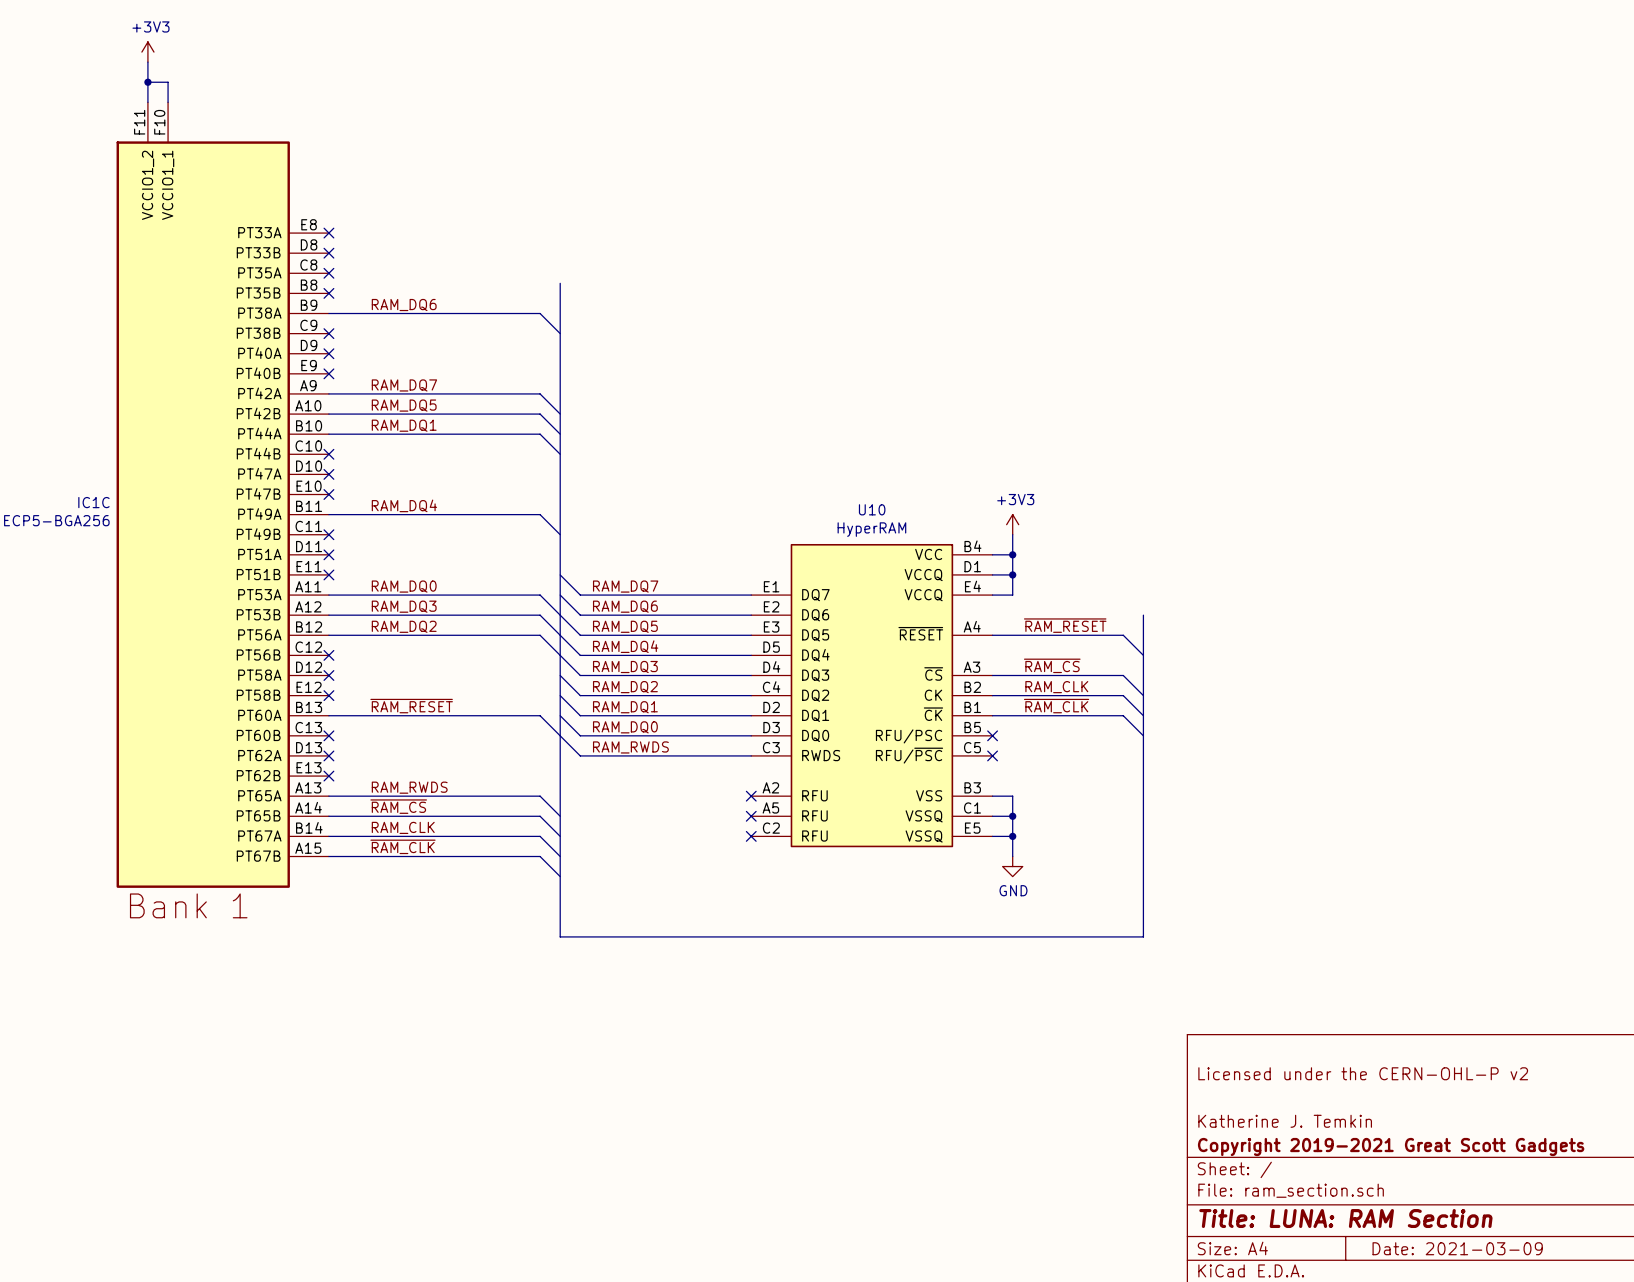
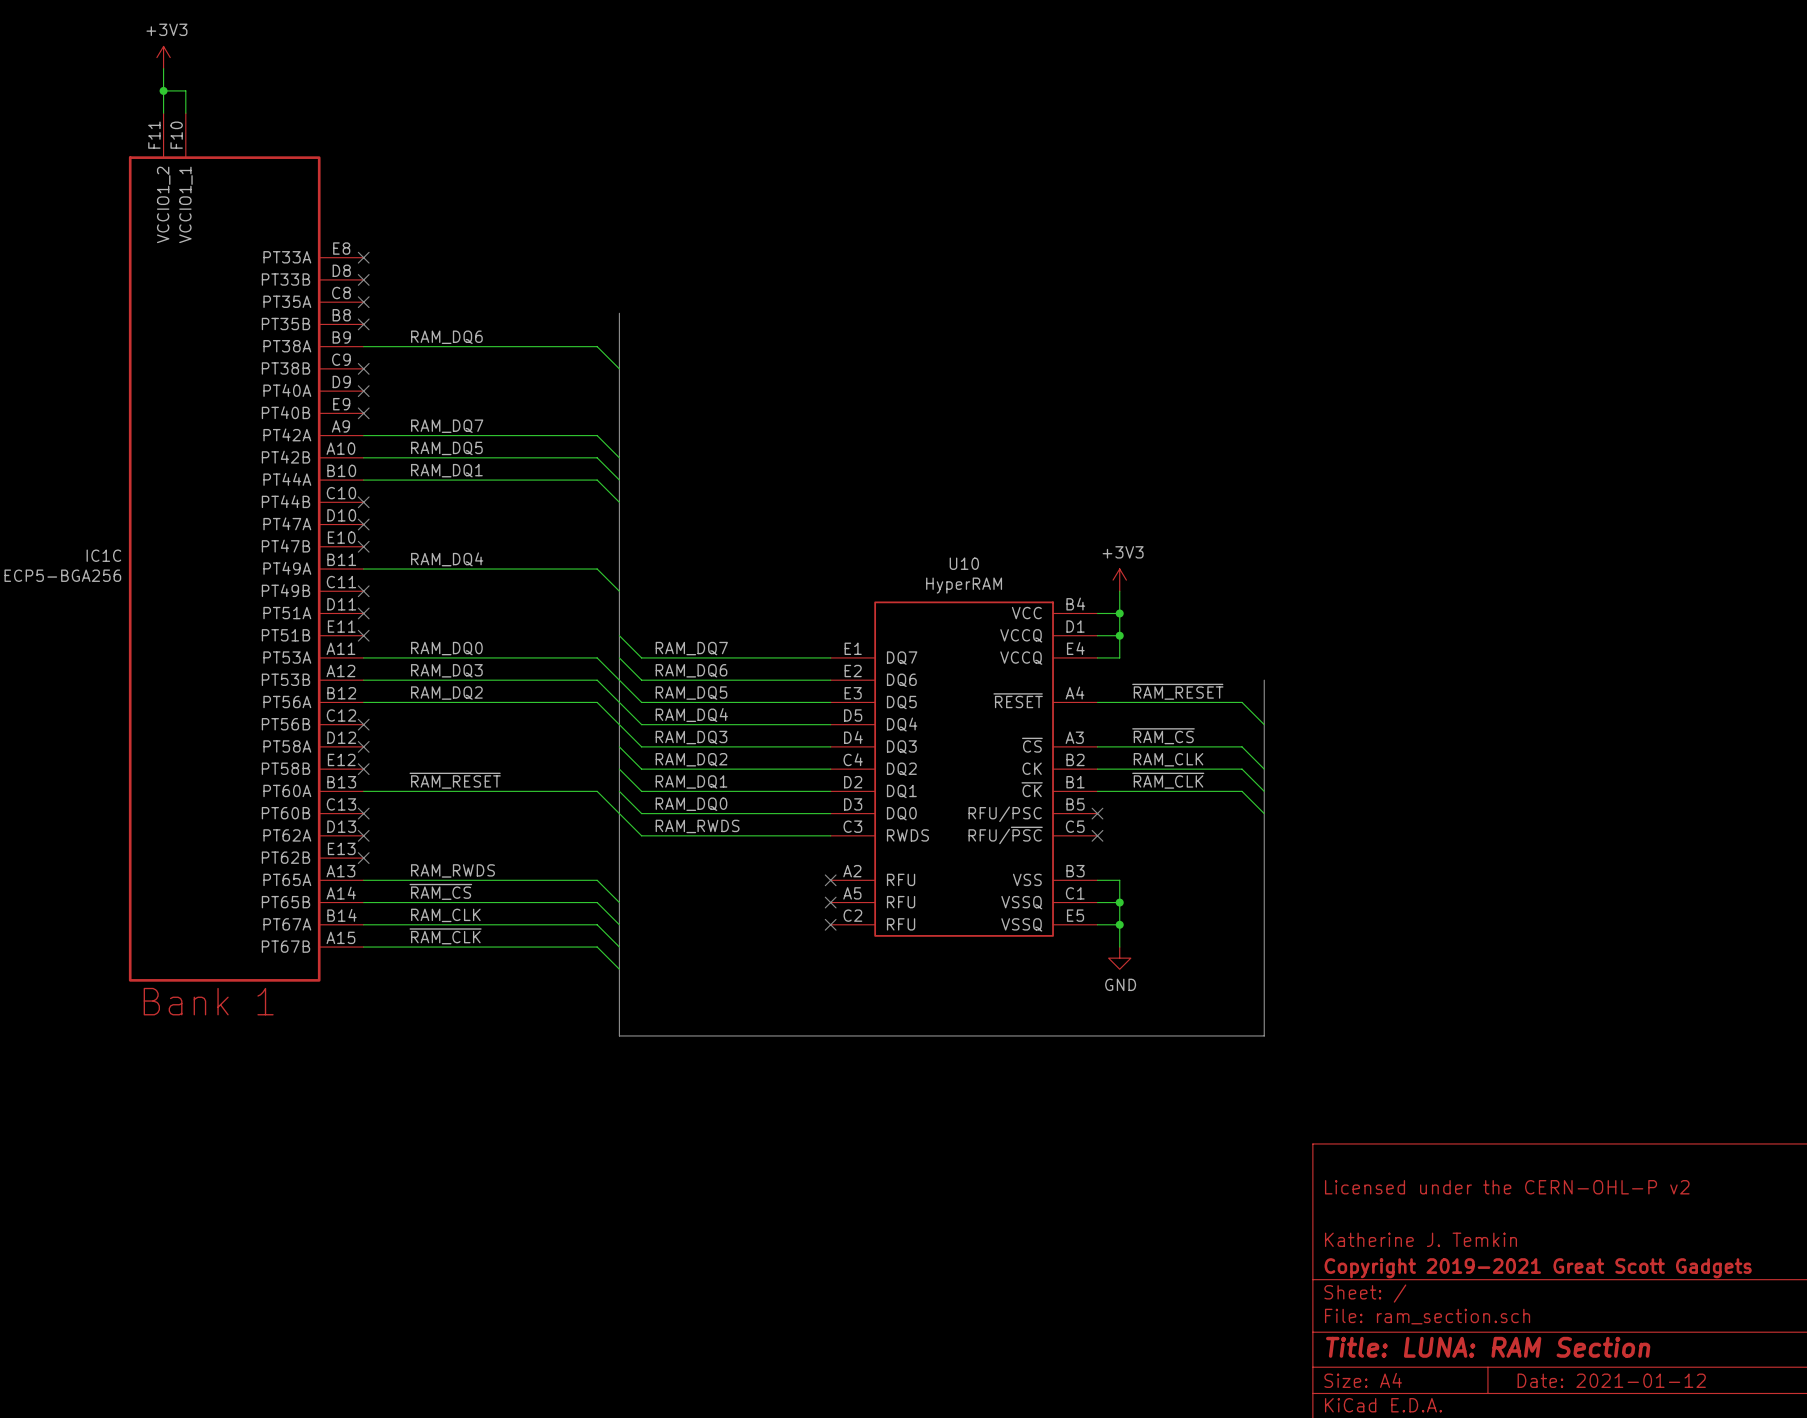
title block: Date: 2021-03-09 (1457, 1248) -> Date: 2021-01-12 (1611, 1380)

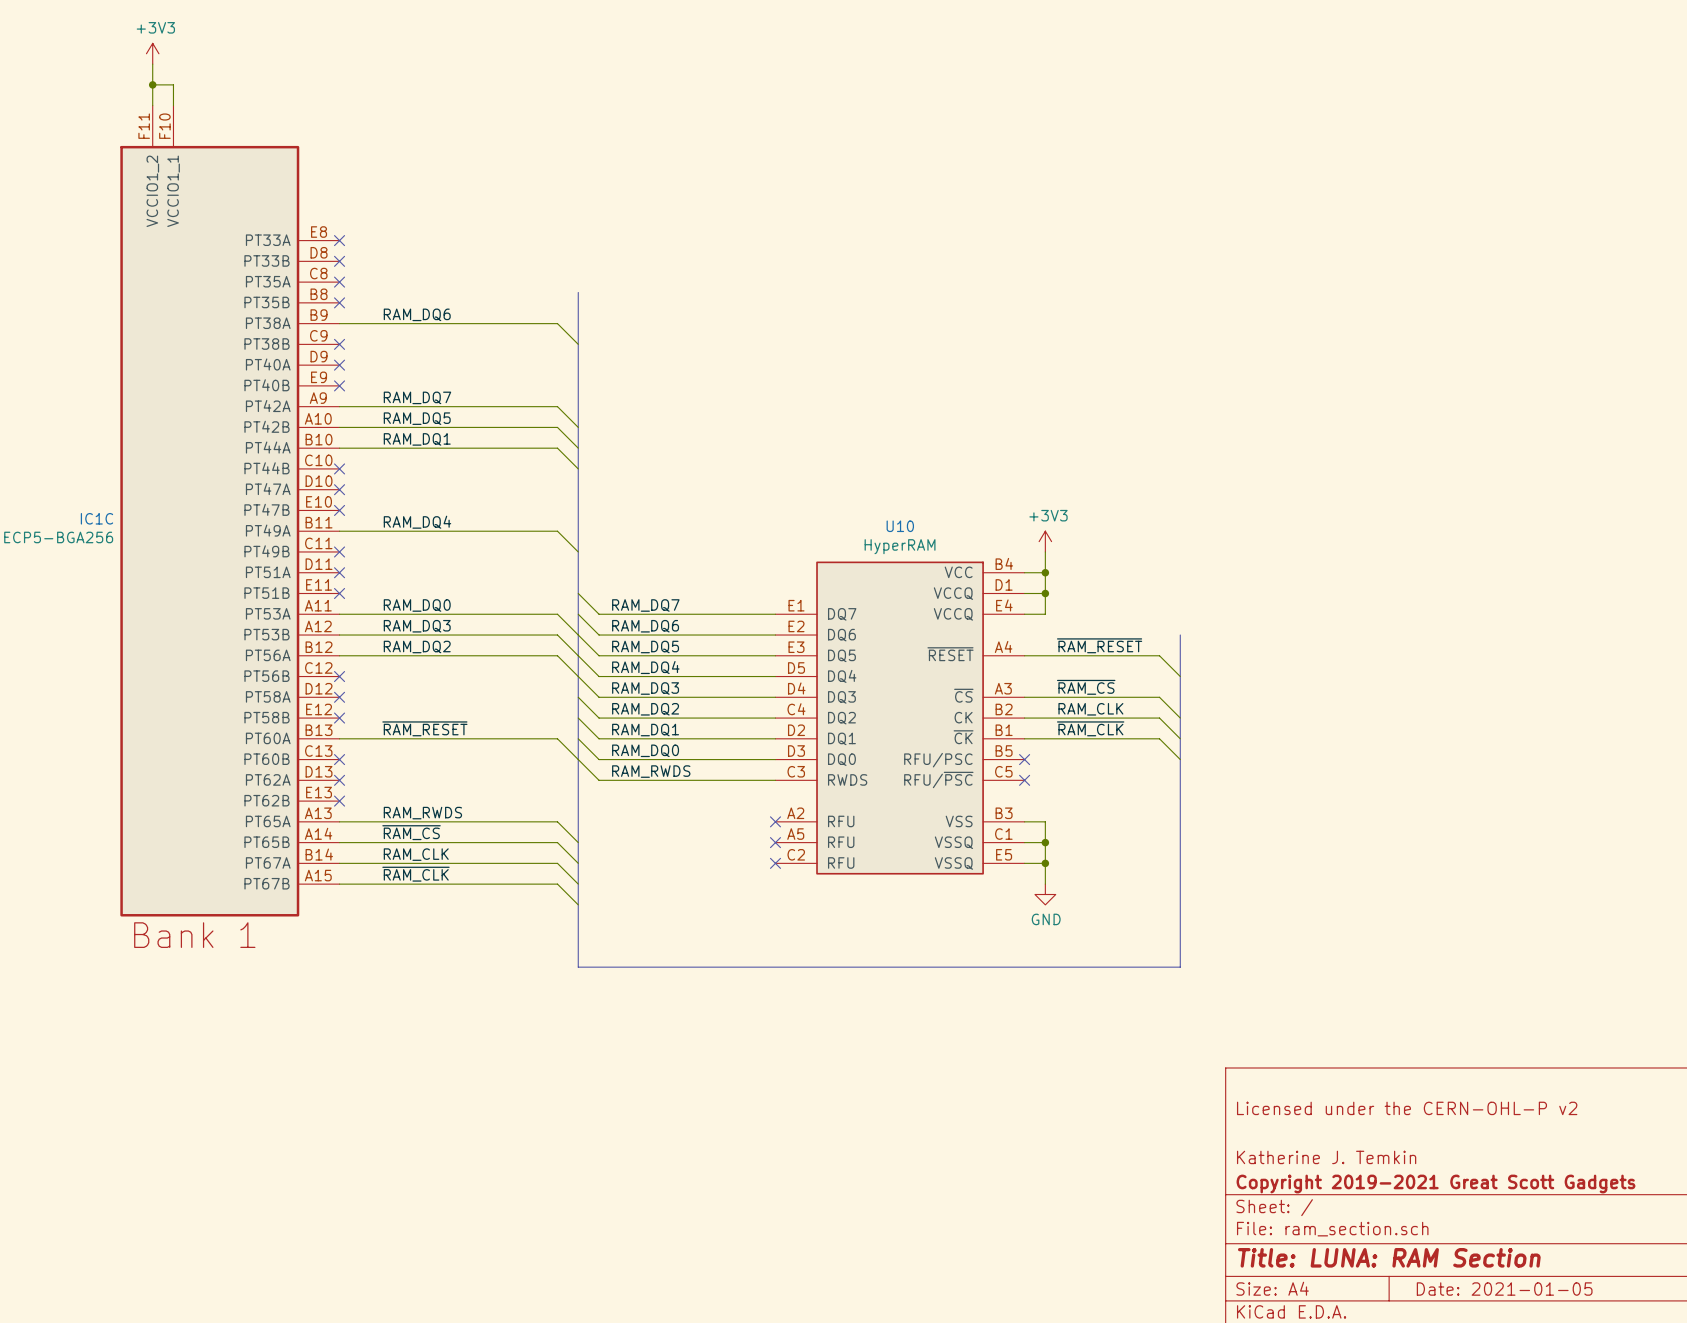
title block: Date: 2021-01-12 (1611, 1380) -> Date: 2021-01-05 (1504, 1289)

